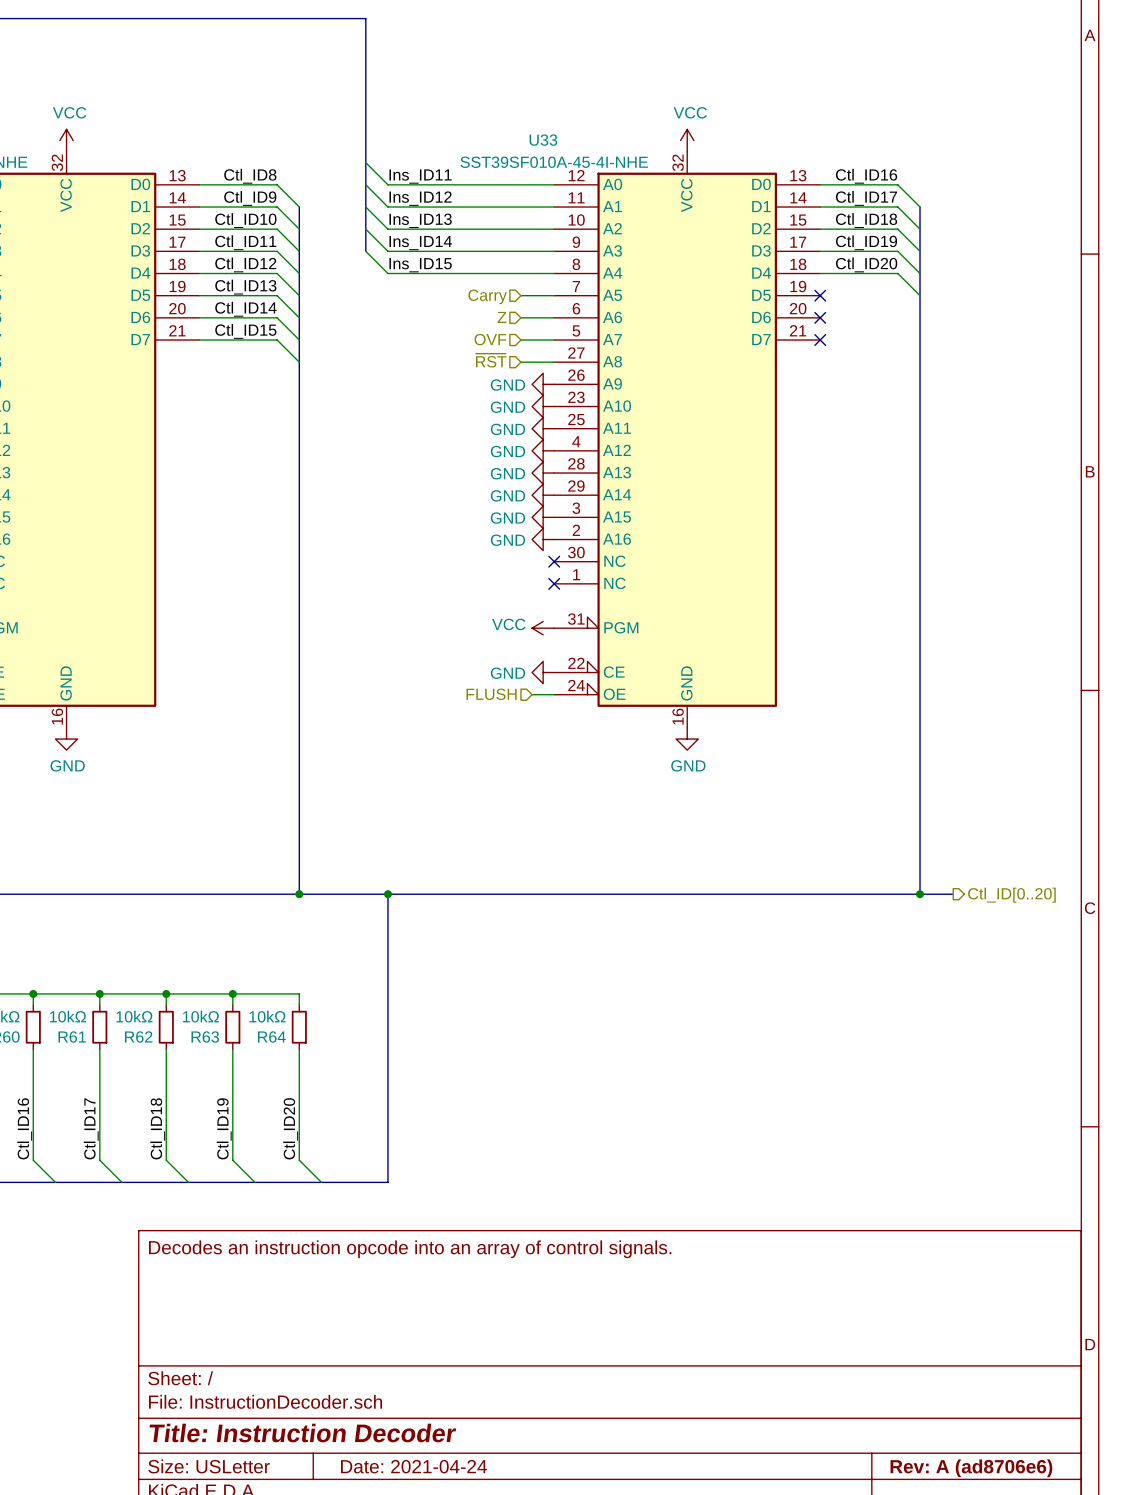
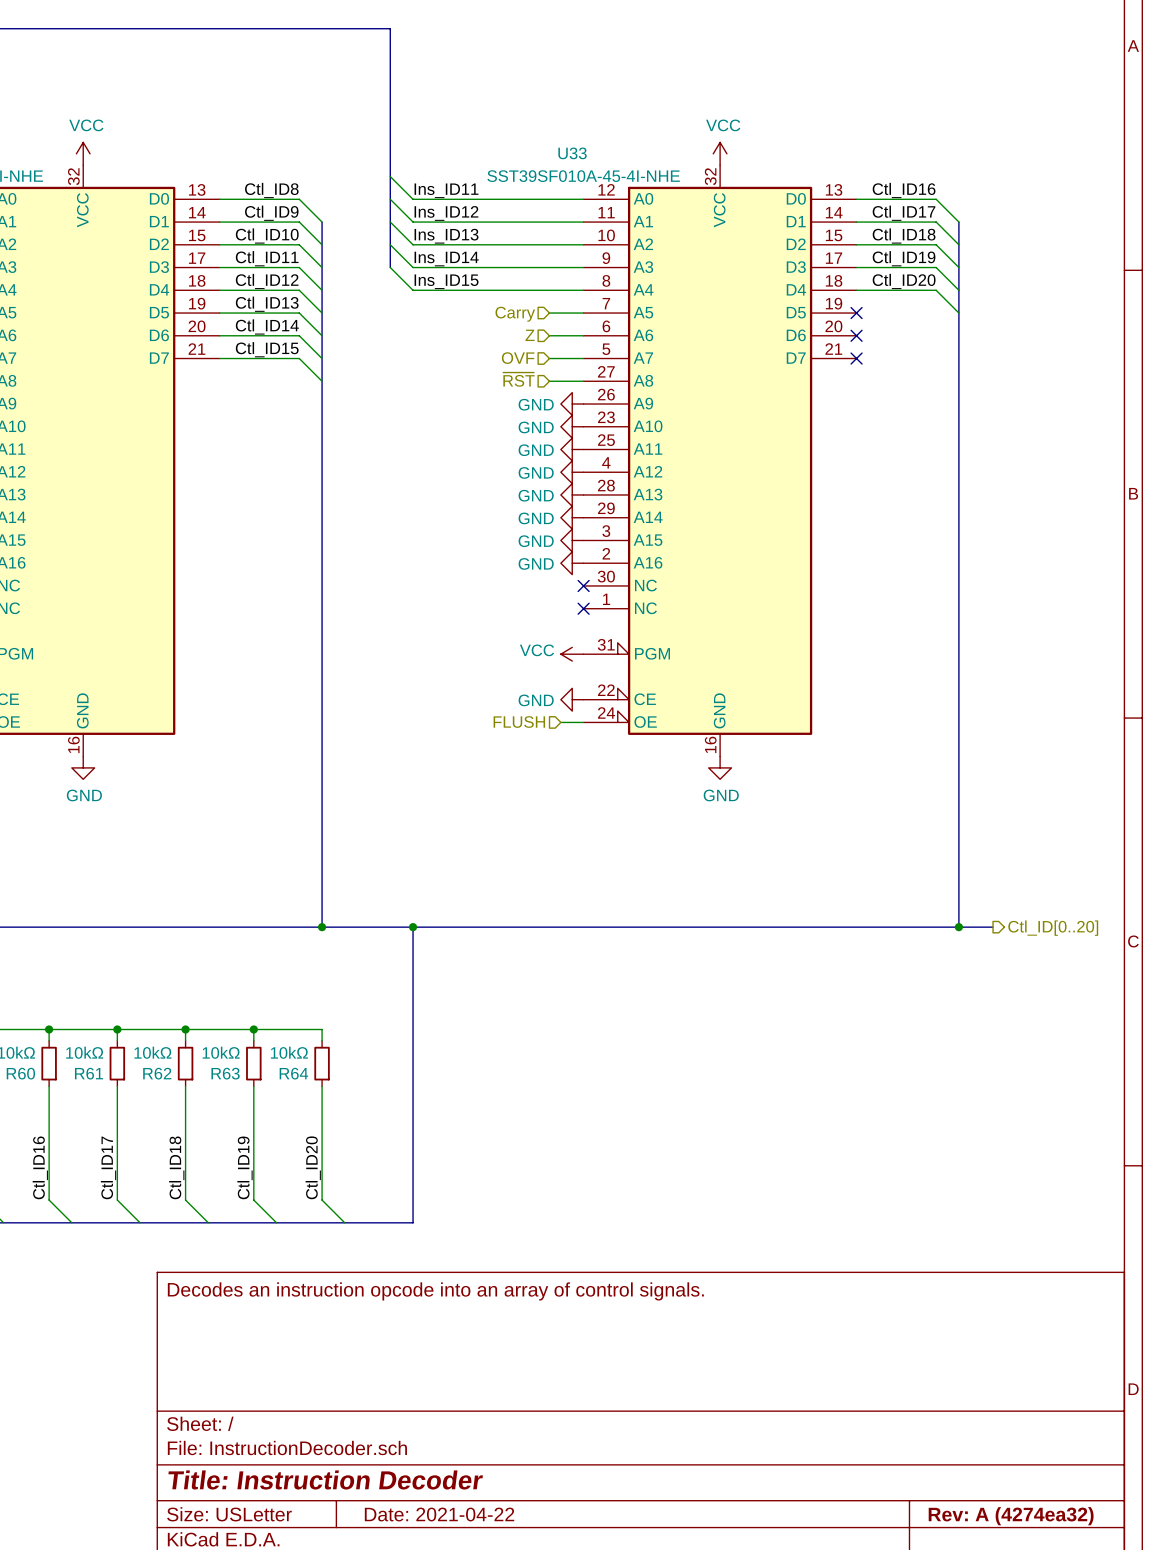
title block: Date: 2021-04-24 (414, 1466) -> Date: 2021-04-22 (439, 1514)
title block: Rev: A (ad8706e6) (971, 1468) -> Rev: A (4274ea32) (1011, 1516)

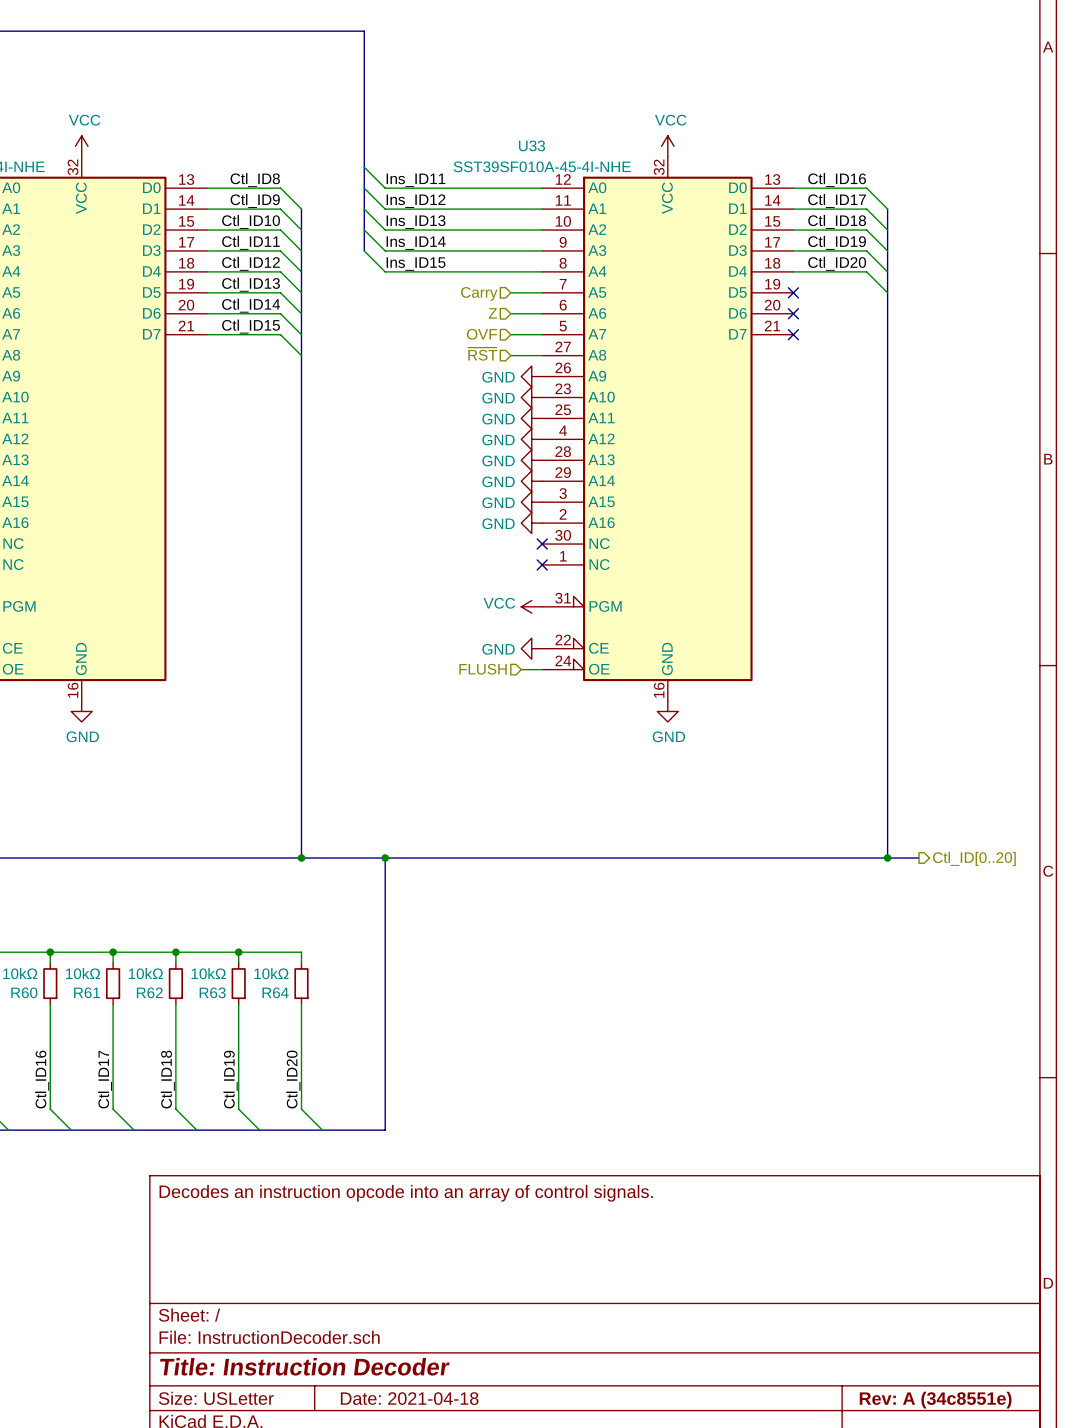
title block: Date: 2021-04-22 (439, 1514) -> Date: 2021-04-18 (409, 1398)
title block: Rev: A (4274ea32) (1011, 1516) -> Rev: A (34c8551e) (935, 1400)

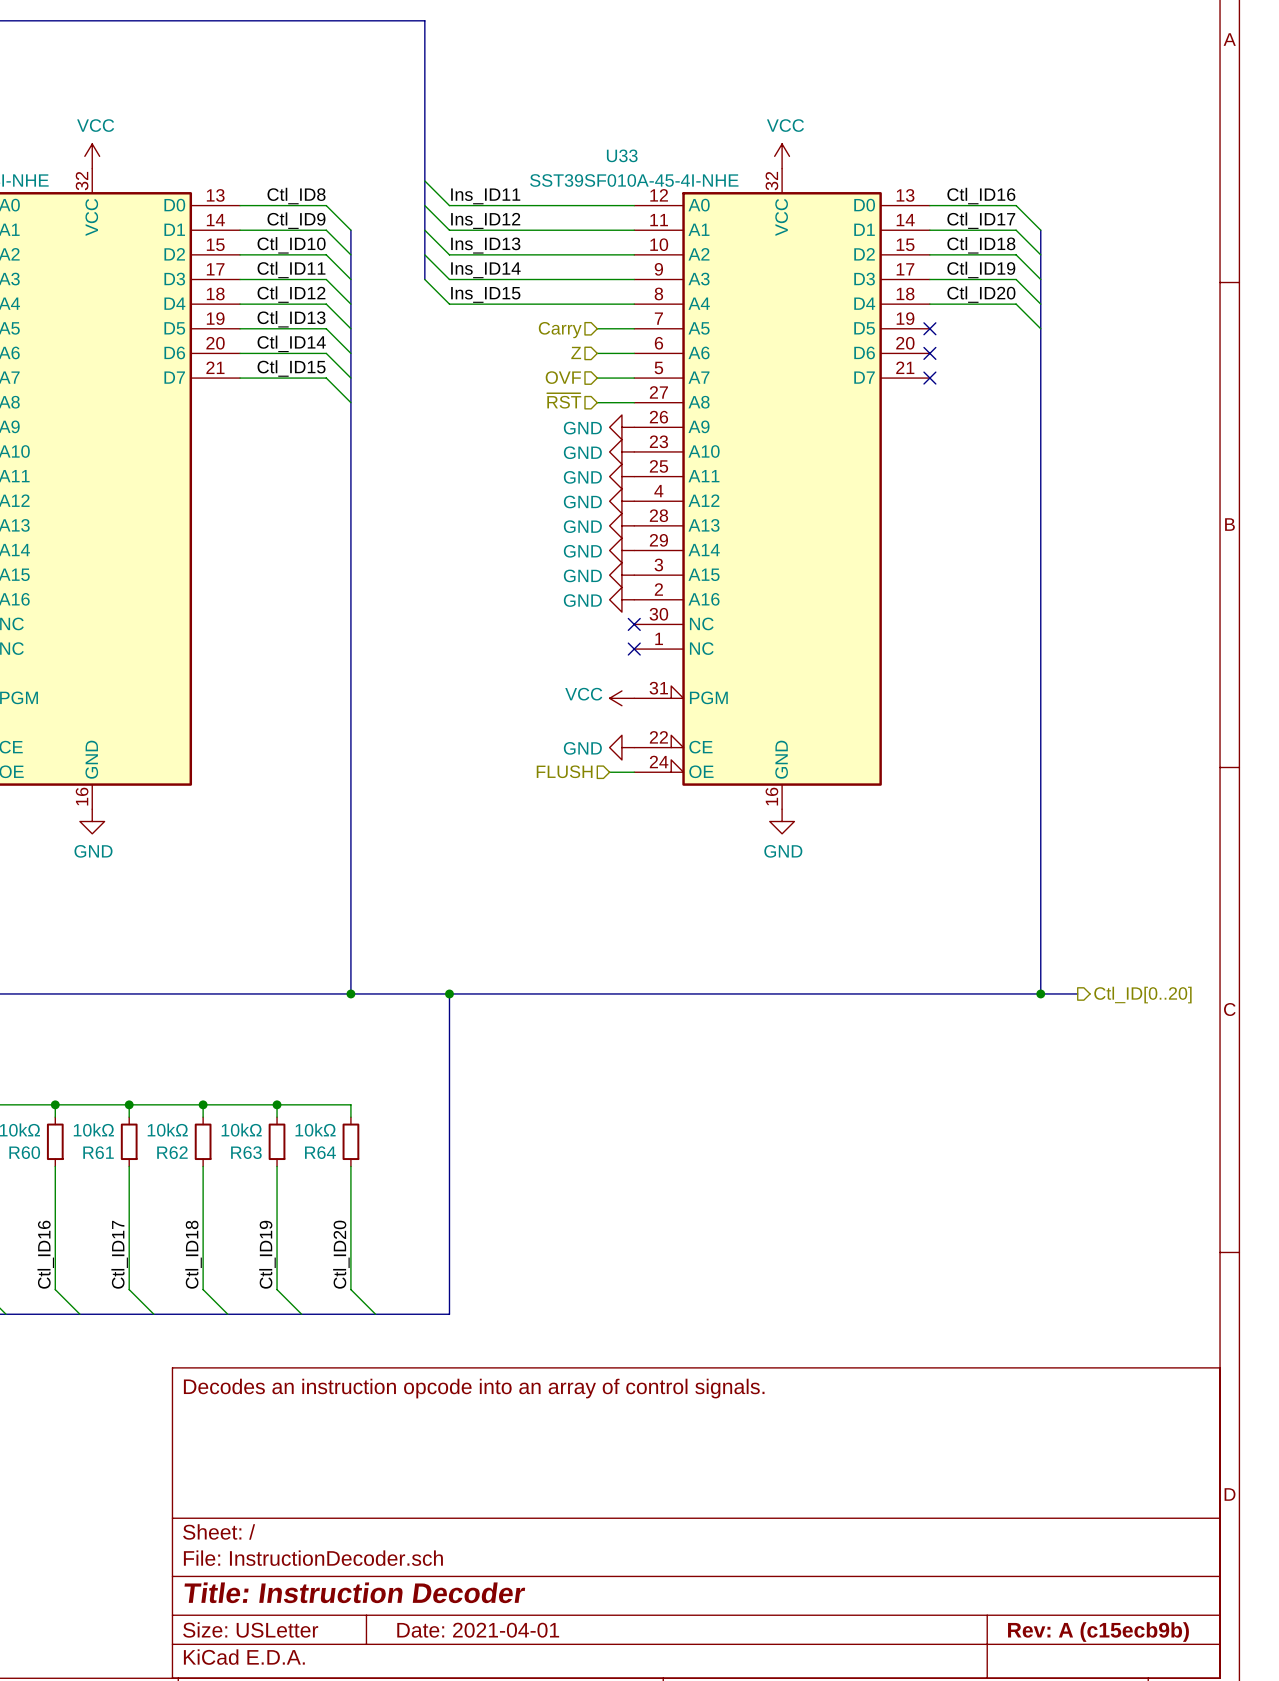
title block: Date: 2021-04-18 (409, 1398) -> Date: 2021-04-01 (478, 1630)
title block: Rev: A (34c8551e) (935, 1400) -> Rev: A (c15ecb9b) (1098, 1632)

